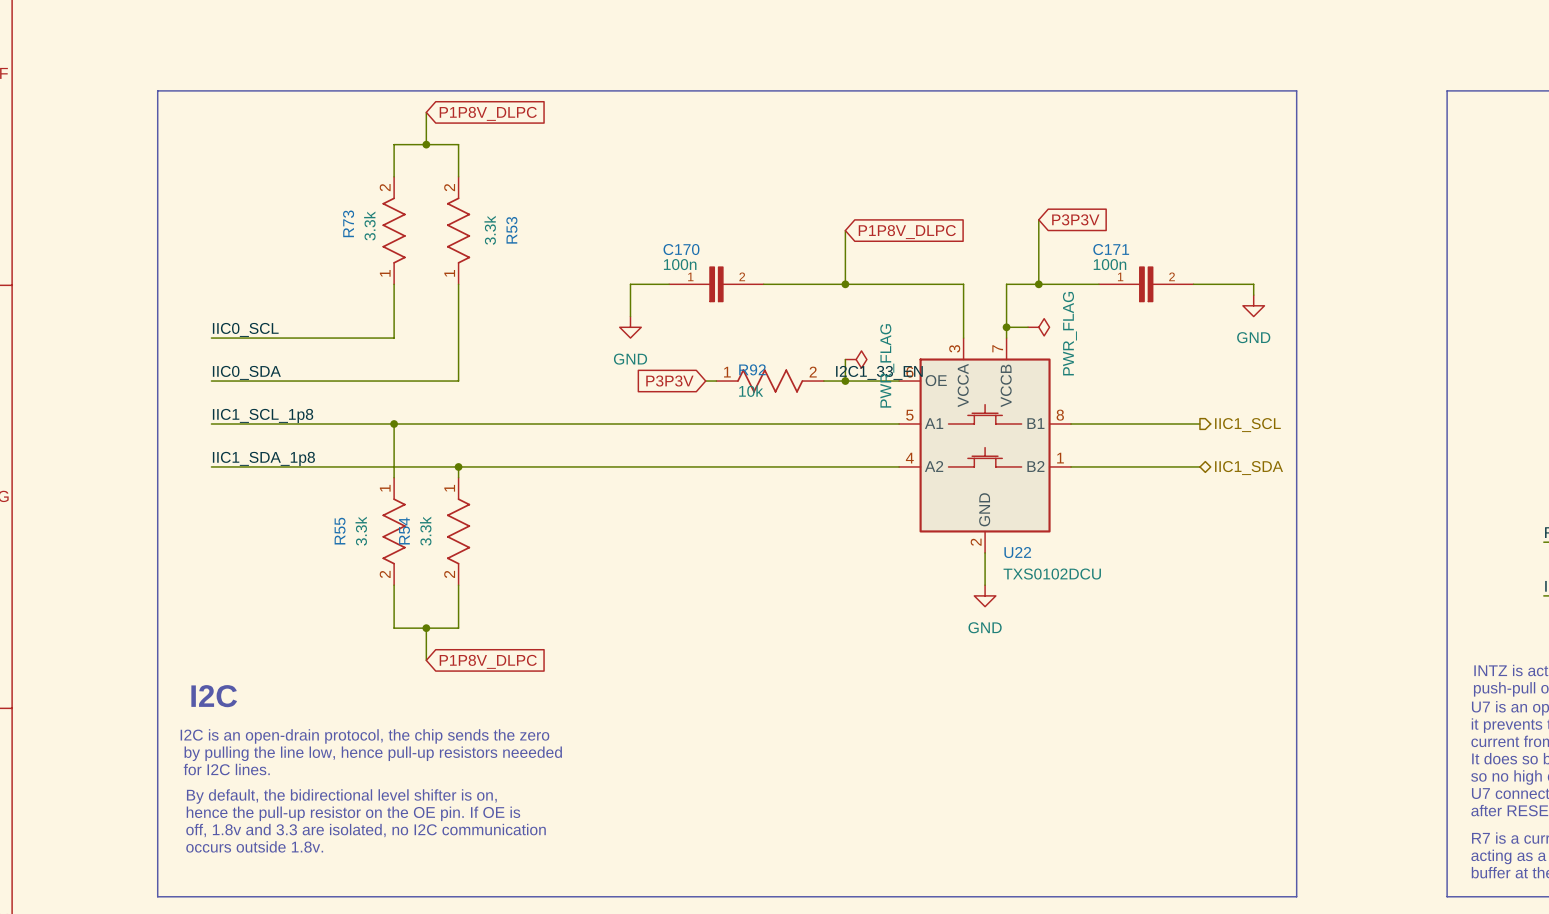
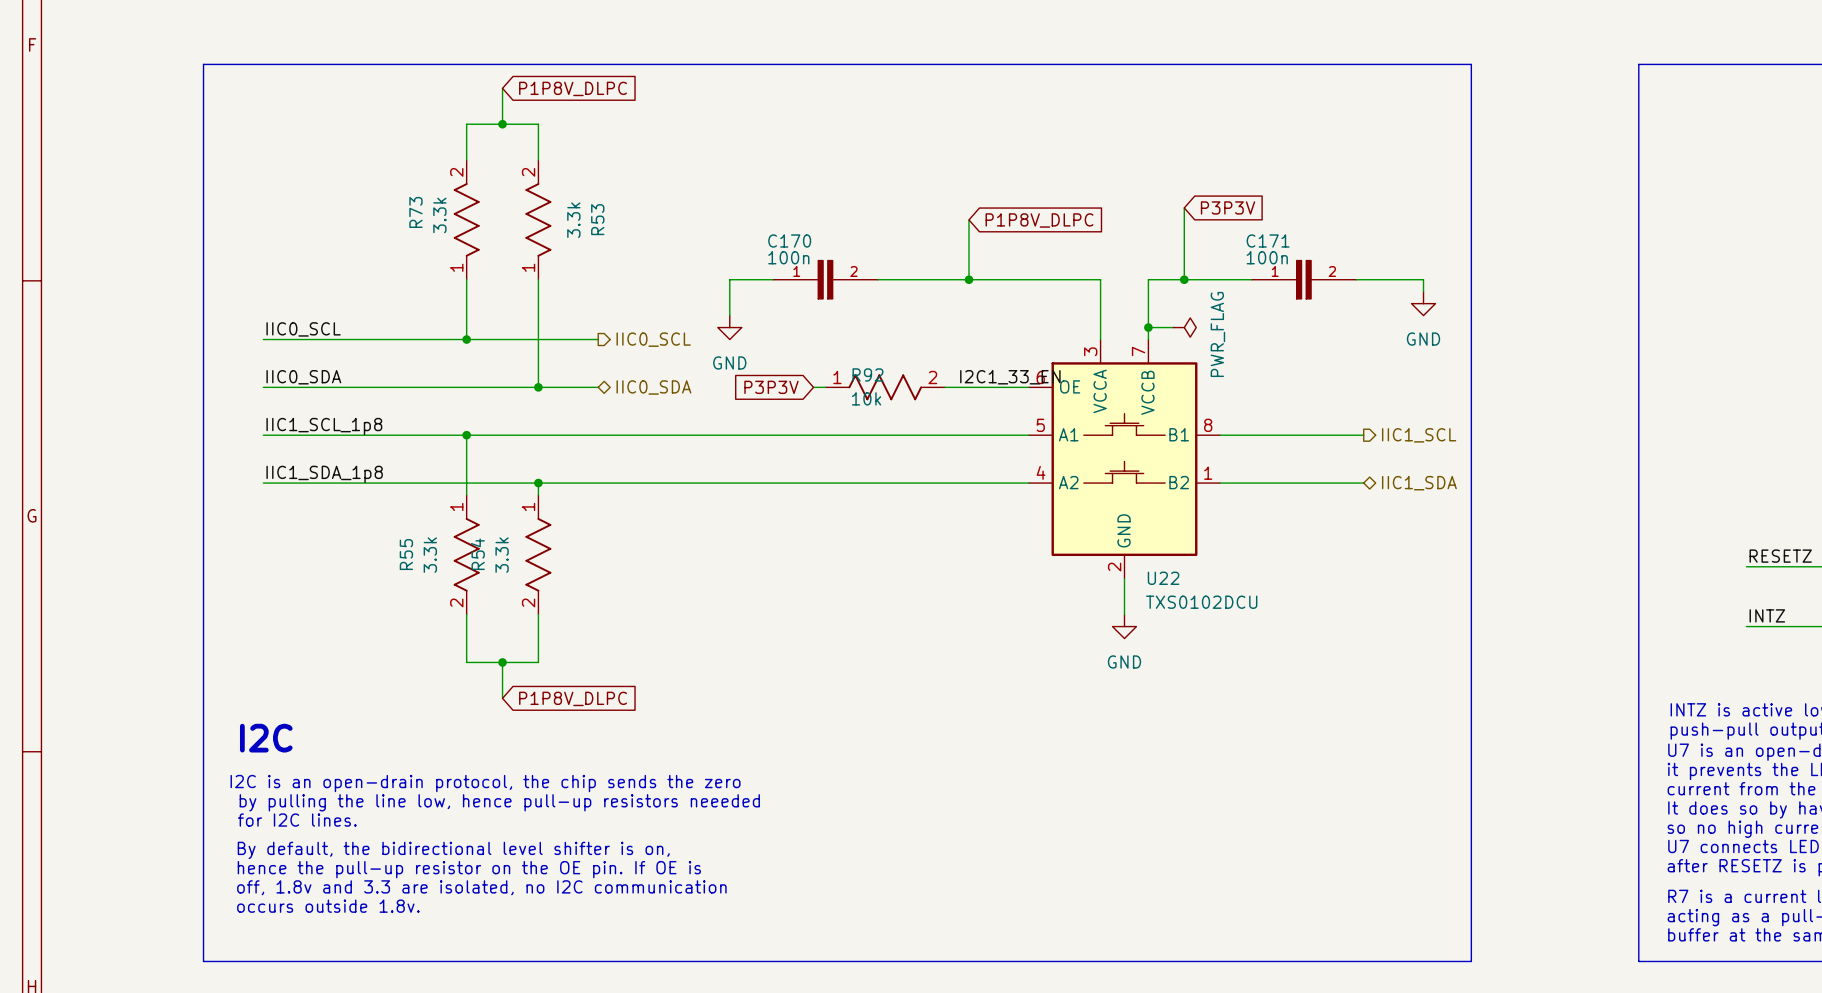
wire: none -> (466, 339) (598, 339)
junction: none -> (466, 339)
hierarchical label: none -> IIC0_SCL (653, 339)
wire: (845, 359) (845, 381) -> none
power symbol: PWR_FLAG (856, 359) -> none
wire: none -> (538, 387) (598, 387)
junction: none -> (538, 387)
junction: (845, 381) -> none
hierarchical label: none -> IIC0_SDA (653, 387)

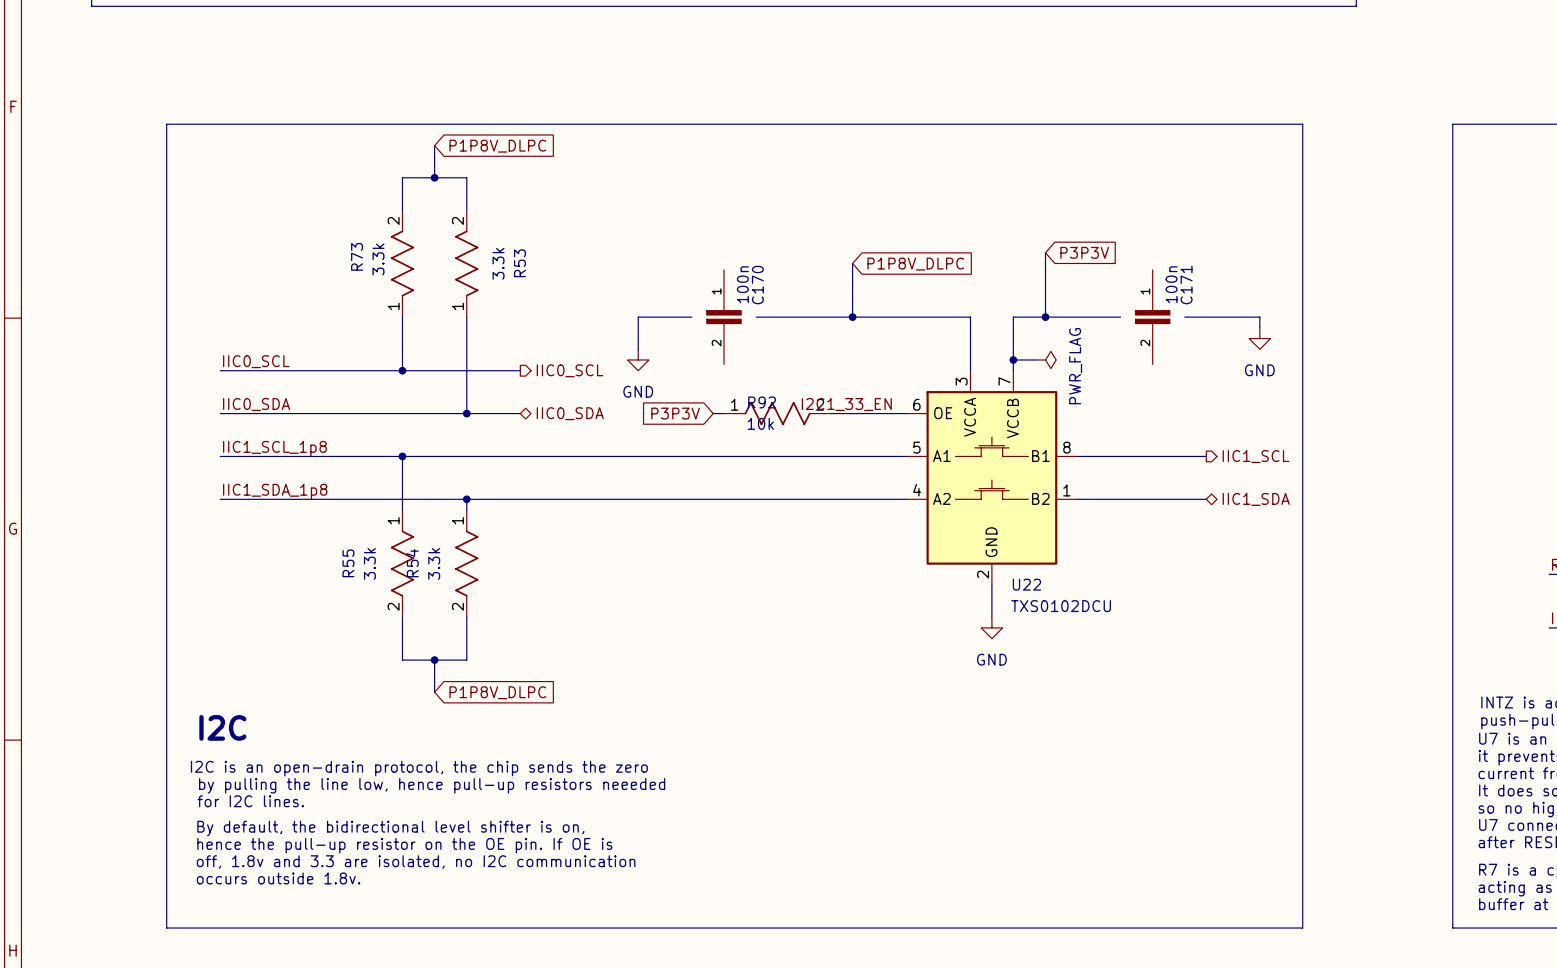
C170 rotation: 0° (825, 279) -> 90° clockwise (723, 317)
C171 rotation: 0° (1303, 279) -> 90° clockwise (1152, 317)
label position: I2C1_33_EN (1010, 377) -> I2C1_33_EN (846, 404)

